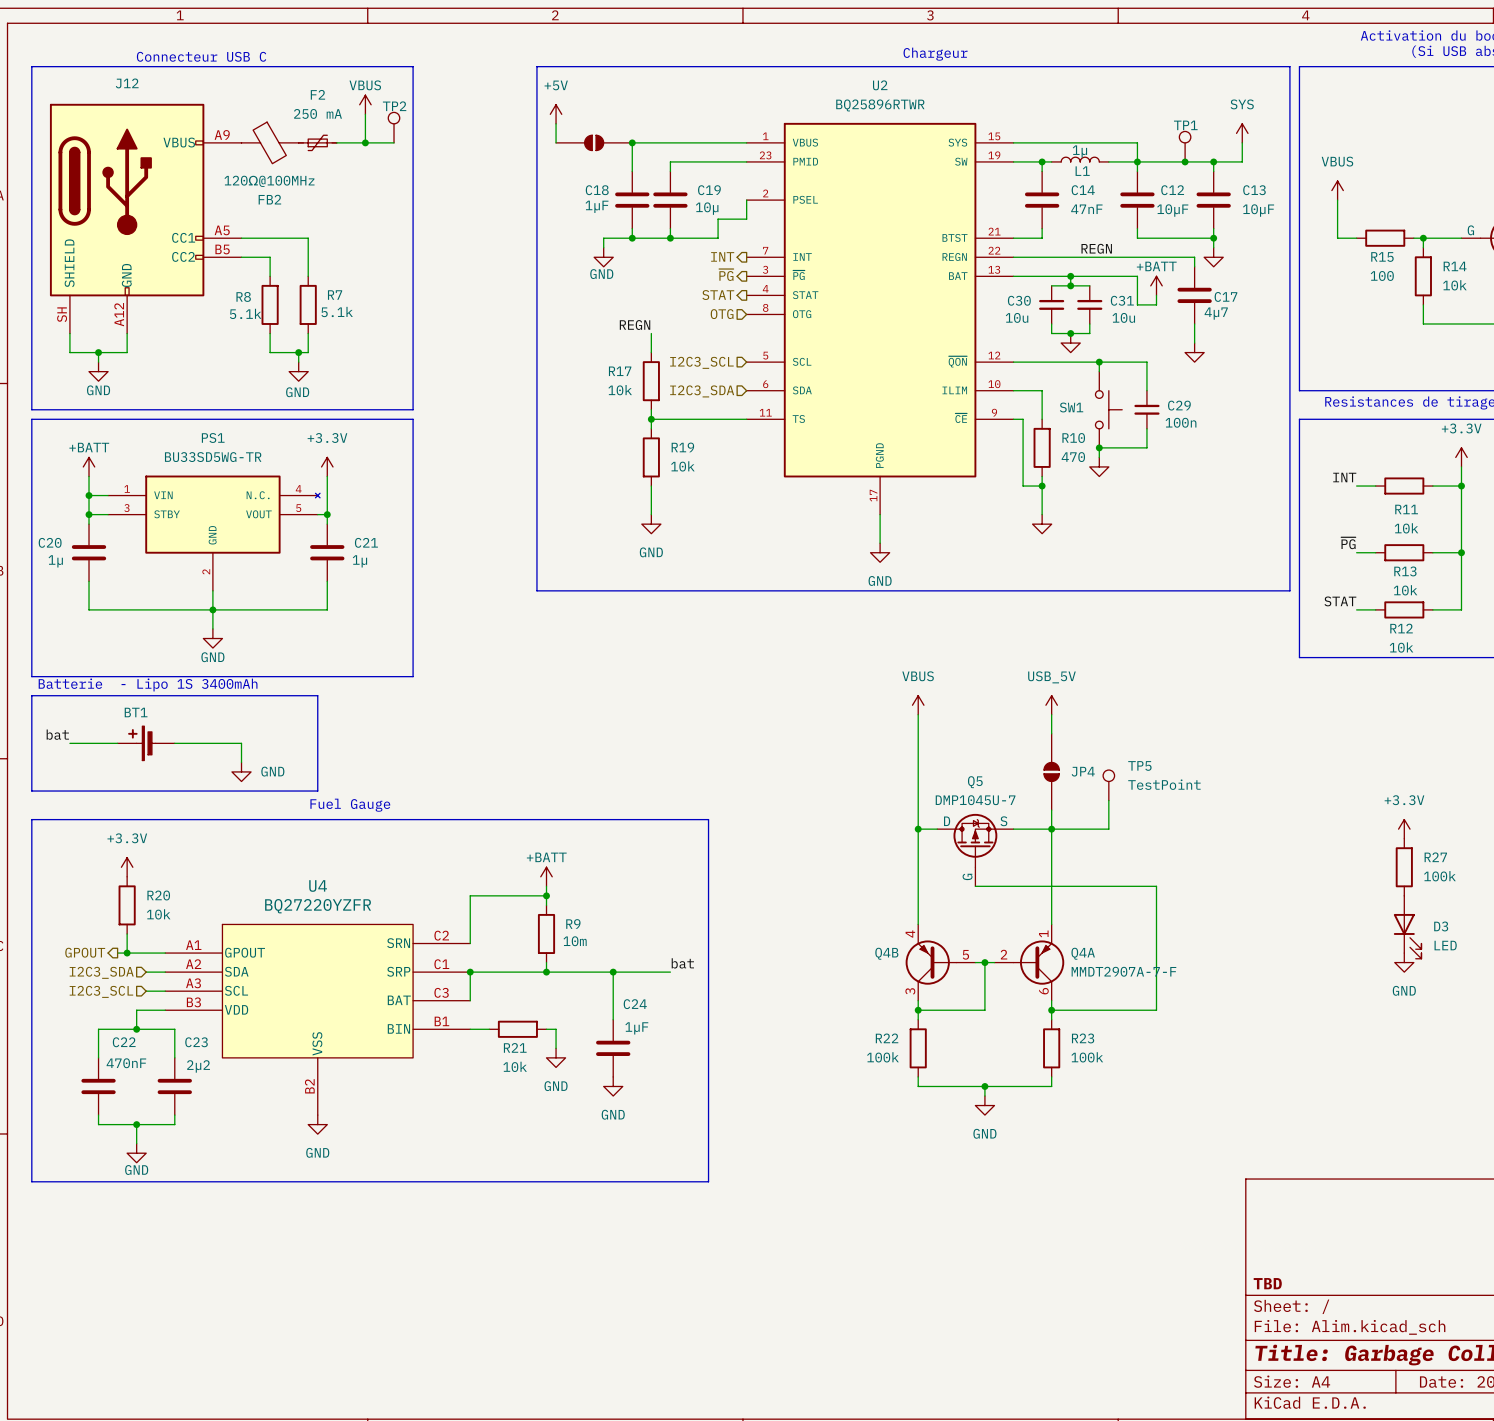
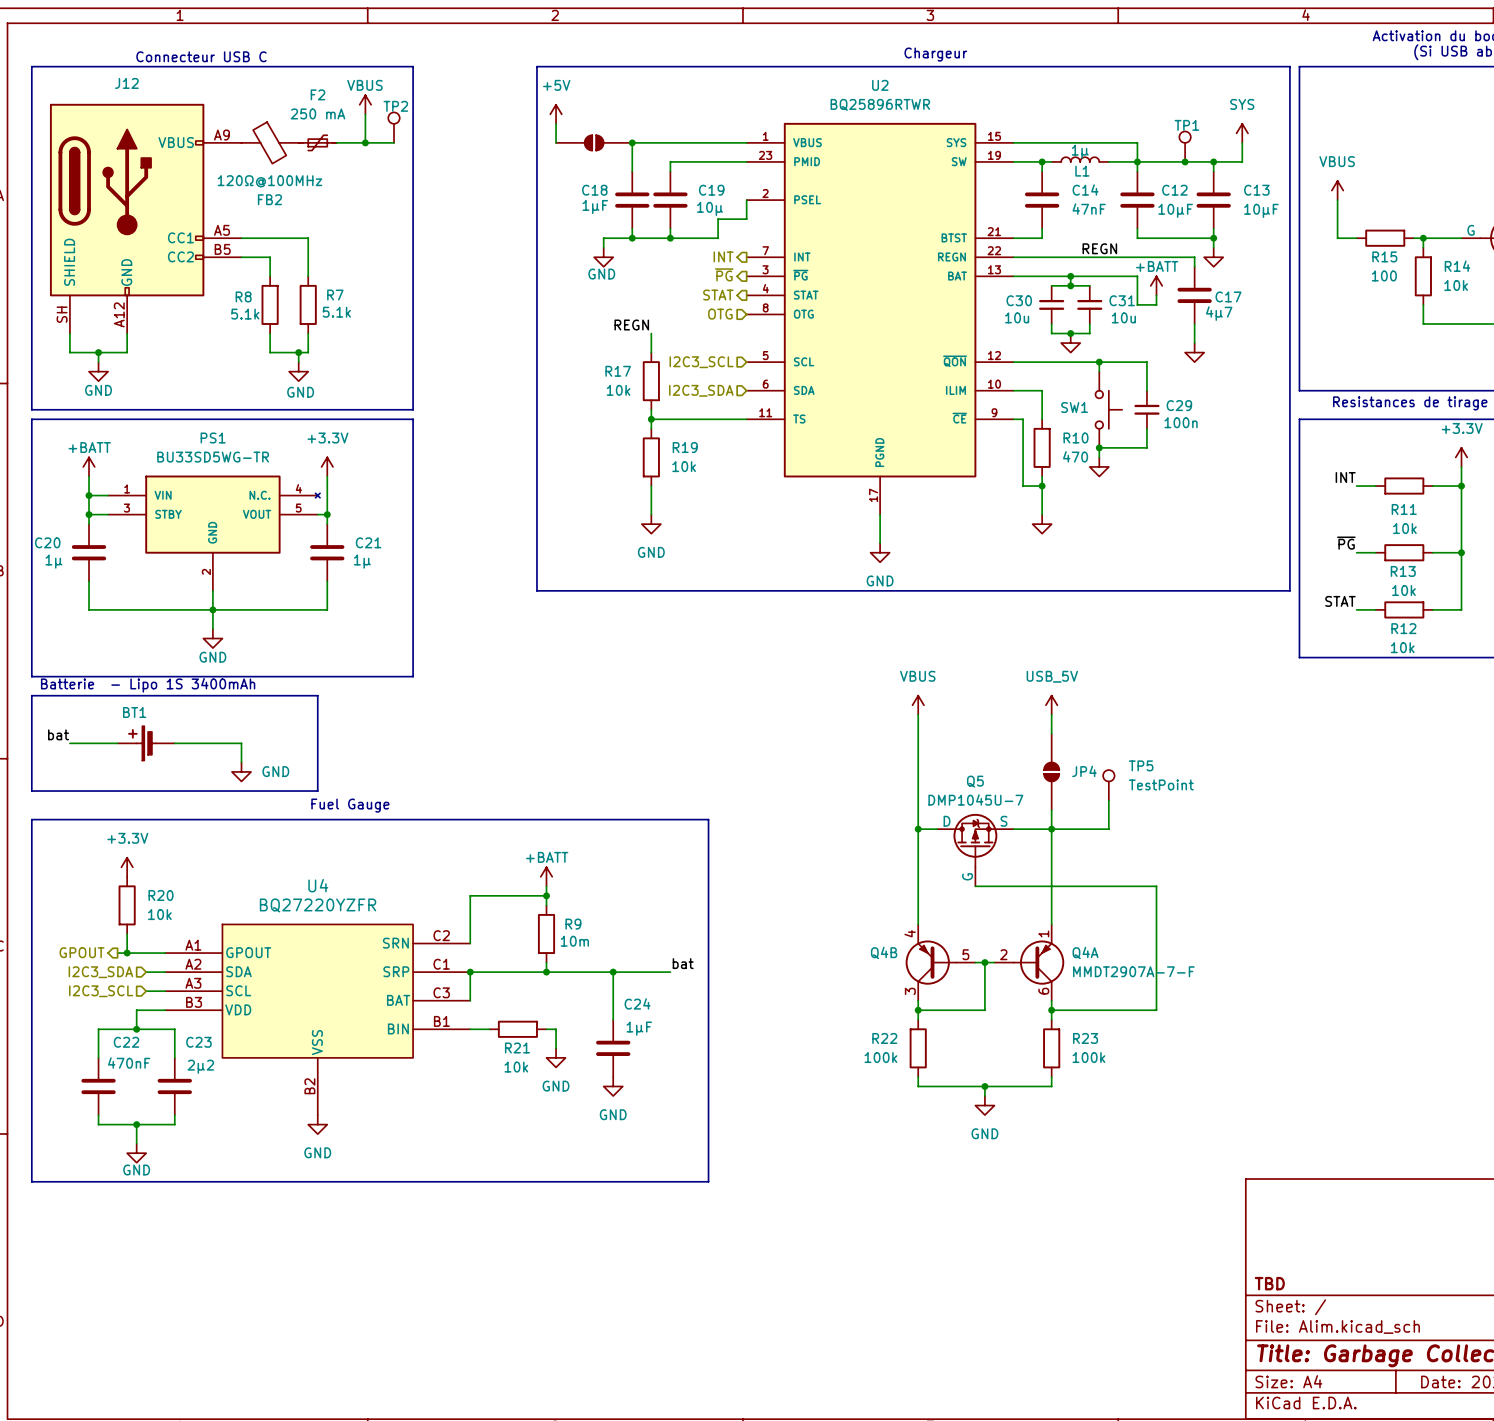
power symbol: +3.3V (1404, 829) -> none
R27: 100k (1404, 867) -> none
D3: LED (1407, 927) -> none
power symbol: GND (1404, 962) -> none

